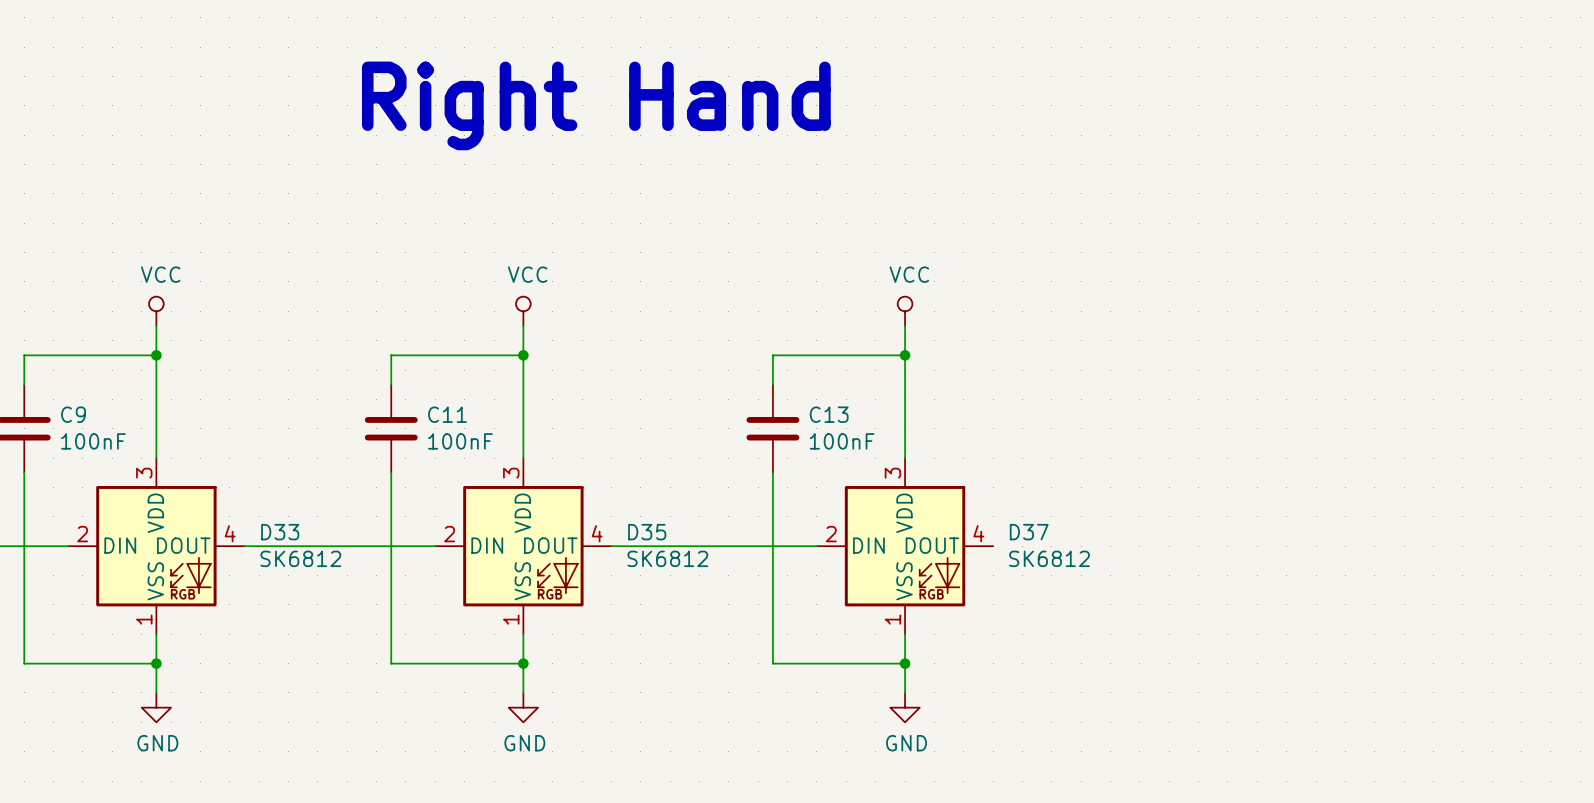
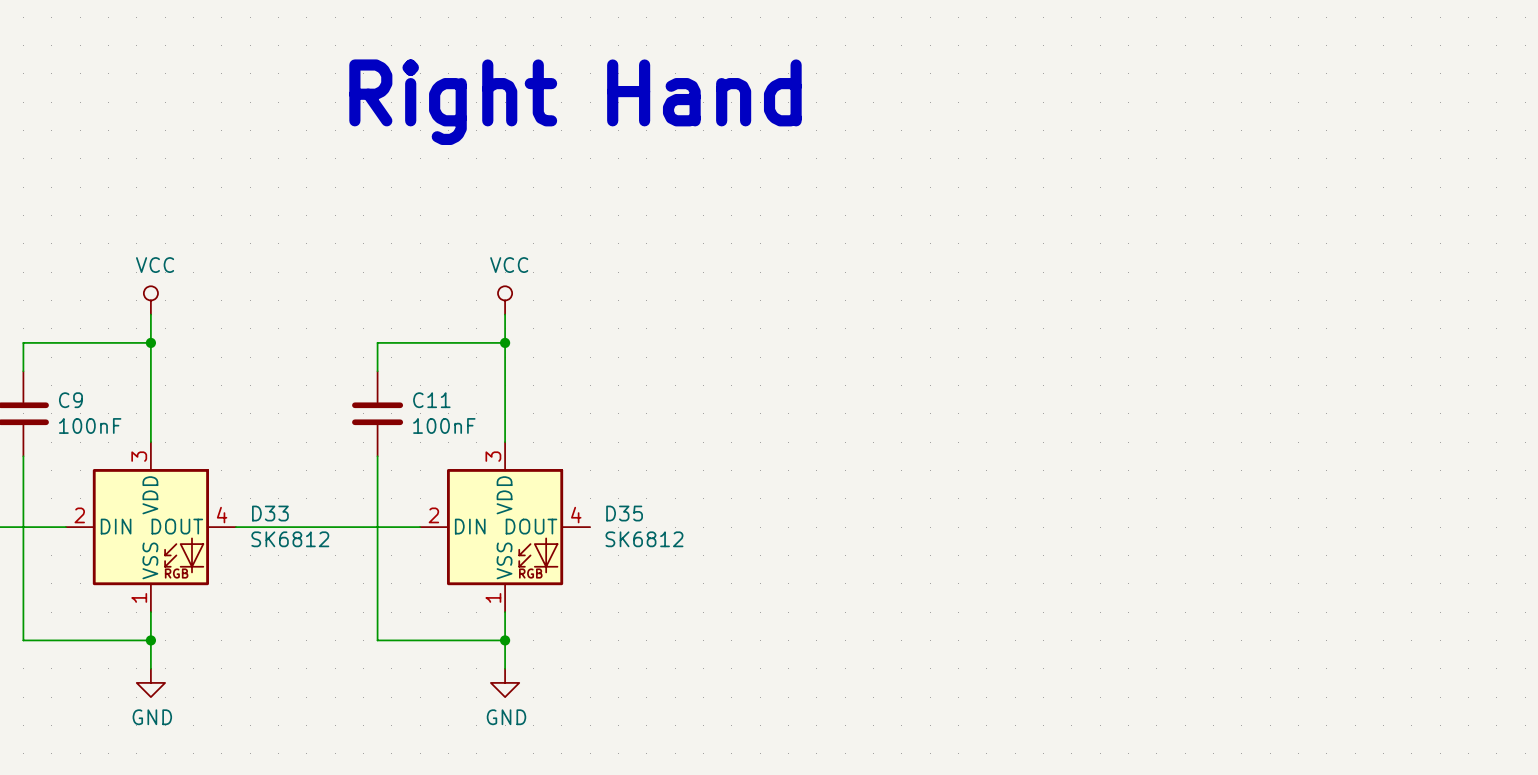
power symbol: VCC (905, 311) -> none
wire: (905, 325) (905, 458) -> none
wire: (905, 355) (772, 355) (772, 384) -> none
junction: (905, 355) -> none
C13: 100nF (772, 428) -> none
wire: (772, 472) (772, 663) (905, 663) -> none
wire: (611, 546) (816, 546) -> none
D37: SK6812 (905, 546) -> none
wire: (905, 634) (905, 692) -> none
junction: (905, 663) -> none
power symbol: GND (905, 707) -> none

